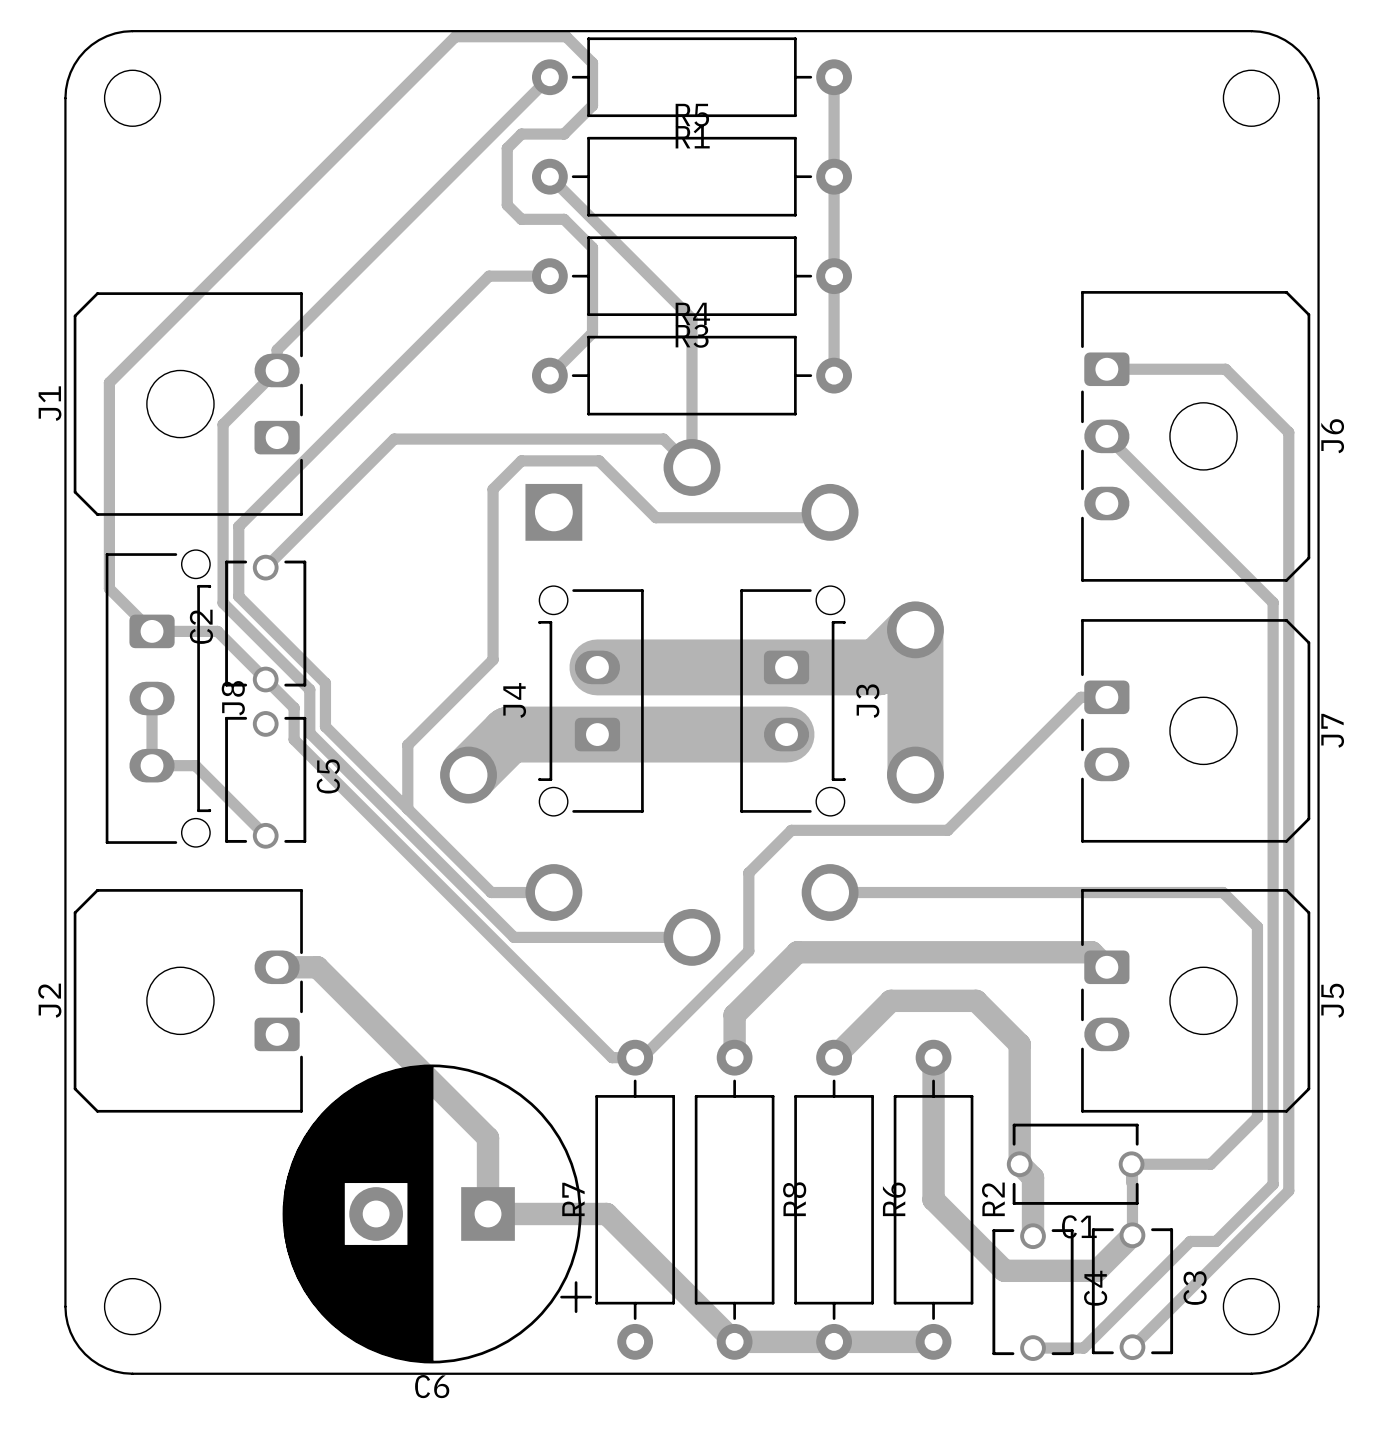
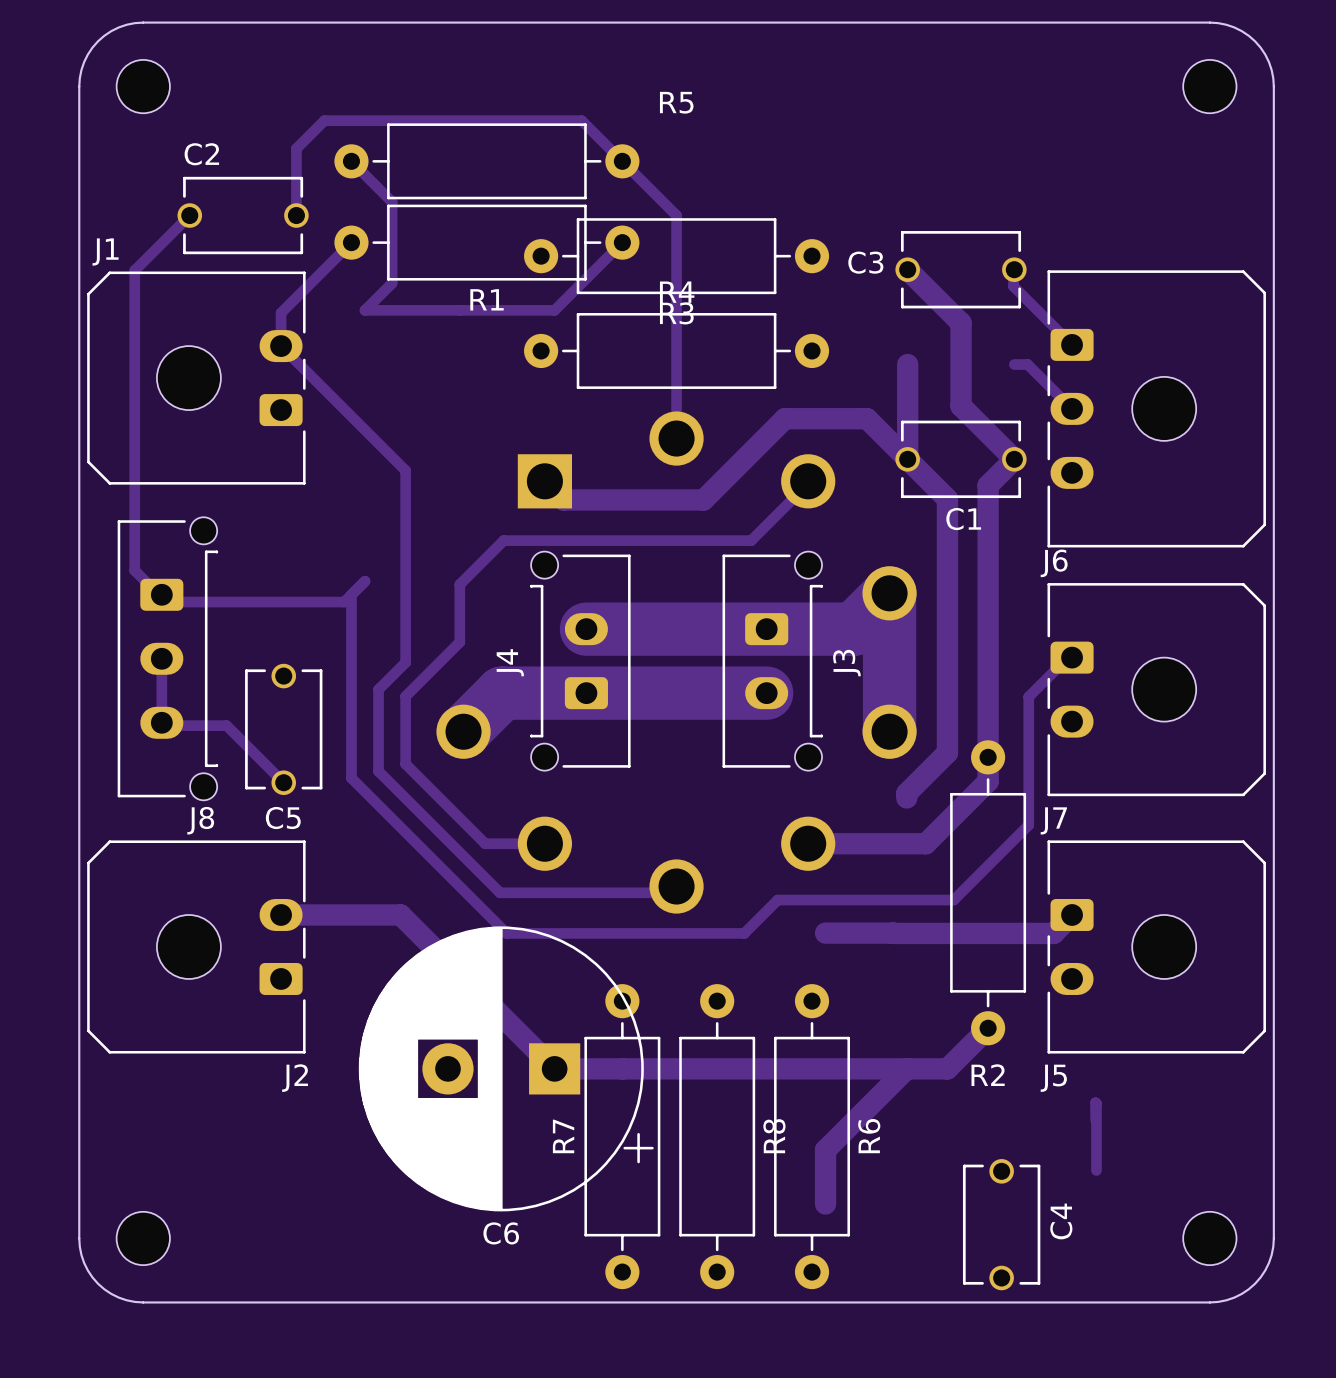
track: (549, 77) (277, 350) -> (351, 242) (281, 313) (281, 326)
R1 position: (691, 77) -> (486, 242)
track: (834, 77) (834, 375) -> none
track: (521, 134) (507, 148) (507, 205) (521, 219) (564, 219) (592, 247) (592, 333) (549, 375) -> (514, 120) (324, 120) (296, 148) (296, 215)
track: (564, 134) (592, 105) (592, 63) (566, 36) (455, 36) (109, 382) (109, 588) (152, 631) (217, 631) (294, 707) (294, 739) (612, 1057) (642, 1057) (748, 951) (748, 872) (791, 830) (947, 830) (1080, 697) (1106, 697) -> none
track: none -> (351, 161) (392, 201) (392, 283) (365, 310) (554, 310) (622, 242)
track: (549, 176) (691, 318) -> (554, 120) (581, 120) (676, 215) (676, 296)
R5 position: (691, 176) -> (486, 161)
track: none -> (189, 215) (134, 270) (134, 570) (166, 602) (344, 602) (365, 581)
track: (549, 276) (489, 276) (238, 526) (238, 596) (325, 683) (325, 726) (407, 809) -> none
track: (1106, 369) (1225, 369) (1288, 432) (1288, 1190) (1132, 1347) -> (1072, 344) (1013, 286) (1013, 269)
track: (277, 370) (223, 424) (223, 602) (309, 689) (309, 733) (514, 937) (691, 937) -> (281, 346) (405, 470) (405, 662) (378, 689) (378, 771) (500, 892) (670, 892) (676, 886)
track: none -> (907, 364) (907, 459)
J1 name rotation: 0° (50, 403) -> 90° clockwise (105, 252)
J1 name position: J1 (50, 403) -> J1 (105, 252)
track: (1106, 436) (1273, 602) (1273, 1184) (1216, 1241) (1190, 1241) (1083, 1348) (1033, 1348) -> (1072, 408) (1027, 364) (1014, 364)
J6 name rotation: 0° (1332, 436) -> 90° clockwise (1054, 563)
J6 name position: J6 (1332, 436) -> J6 (1054, 563)
track: (691, 467) (663, 439) (394, 439) (265, 567) -> none
track: none -> (544, 481) (563, 499) (703, 499) (784, 418) (867, 418) (947, 499) (947, 752) (906, 793) (906, 797)
track: (827, 517) (655, 517) (599, 460) (521, 460) (493, 489) (493, 659) (407, 745) -> (805, 486) (751, 540) (503, 540) (459, 584) (459, 642) (405, 696) (405, 703)
C2 rotation: 0° (265, 623) -> 90° clockwise (243, 215)
C2 position: (265, 623) -> (243, 215)
J8 name rotation: 0° (233, 698) -> 90° clockwise (200, 820)
J8 name position: J8 (233, 698) -> J8 (200, 820)
track: none -> (1072, 662) (1063, 662) (1028, 696) (1028, 825) (953, 900) (777, 900)
J7 name rotation: 0° (1332, 730) -> 90° clockwise (1053, 820)
J7 name position: J7 (1332, 730) -> J7 (1053, 820)
track: (152, 765) (195, 765) (265, 835) -> (161, 722) (161, 725) (226, 725) (283, 782)
C5 name rotation: 0° (328, 776) -> 90° clockwise (283, 818)
C5 name position: C5 (328, 776) -> C5 (283, 818)
C5 position: (265, 779) -> (283, 729)
track width: thin (830, 892) (953, 892) -> thick (808, 843) (925, 843)
track: (953, 892) (1223, 892) (1257, 926) (1257, 1117) (1210, 1164) (1131, 1164) -> (925, 843) (988, 781) (988, 485) (1014, 459) (961, 406) (961, 323) (907, 269)
track: (797, 952) (1091, 952) (1106, 967) -> (825, 933) (1053, 933) (1072, 914)
track width: thick (797, 952) (763, 986) -> thin (777, 900) (744, 933)
track: (317, 967) (488, 1137) (488, 1213) (606, 1213) (734, 1341) (933, 1341) -> (319, 914) (400, 914) (554, 1068) (947, 1068) (988, 1028)
track: (763, 986) (734, 1015) (734, 1057) -> (744, 933) (506, 933) (351, 778) (351, 594)
J2 name rotation: 0° (49, 1000) -> 90° clockwise (295, 1078)
J2 name position: J2 (49, 1000) -> J2 (295, 1078)
J5 name rotation: 0° (1332, 1000) -> 90° clockwise (1053, 1078)
J5 name position: J5 (1332, 1000) -> J5 (1053, 1078)
track: (834, 1057) (890, 1000) (976, 1000) (1019, 1044) (1019, 1164) -> none
track: (933, 1057) (933, 1199) (1004, 1270) (1096, 1270) (1132, 1235) (1125, 1235) -> none
track: none -> (906, 1068) (825, 1150) (825, 1204)
track: (1019, 1164) (1033, 1177) (1033, 1236) -> none
C1 position: (1075, 1164) -> (961, 459)
R2 position: (933, 1199) -> (988, 892)
R2 name rotation: 0° (993, 1199) -> 90° clockwise (988, 1075)
R2 name position: R2 (993, 1199) -> R2 (988, 1075)
C6 position: (437, 1213) -> (506, 1068)
C3 name position: C3 (1195, 1288) -> C3 (865, 262)
C3 rotation: 0° (1132, 1291) -> 90° clockwise (961, 269)
C3 position: (1132, 1291) -> (961, 269)

